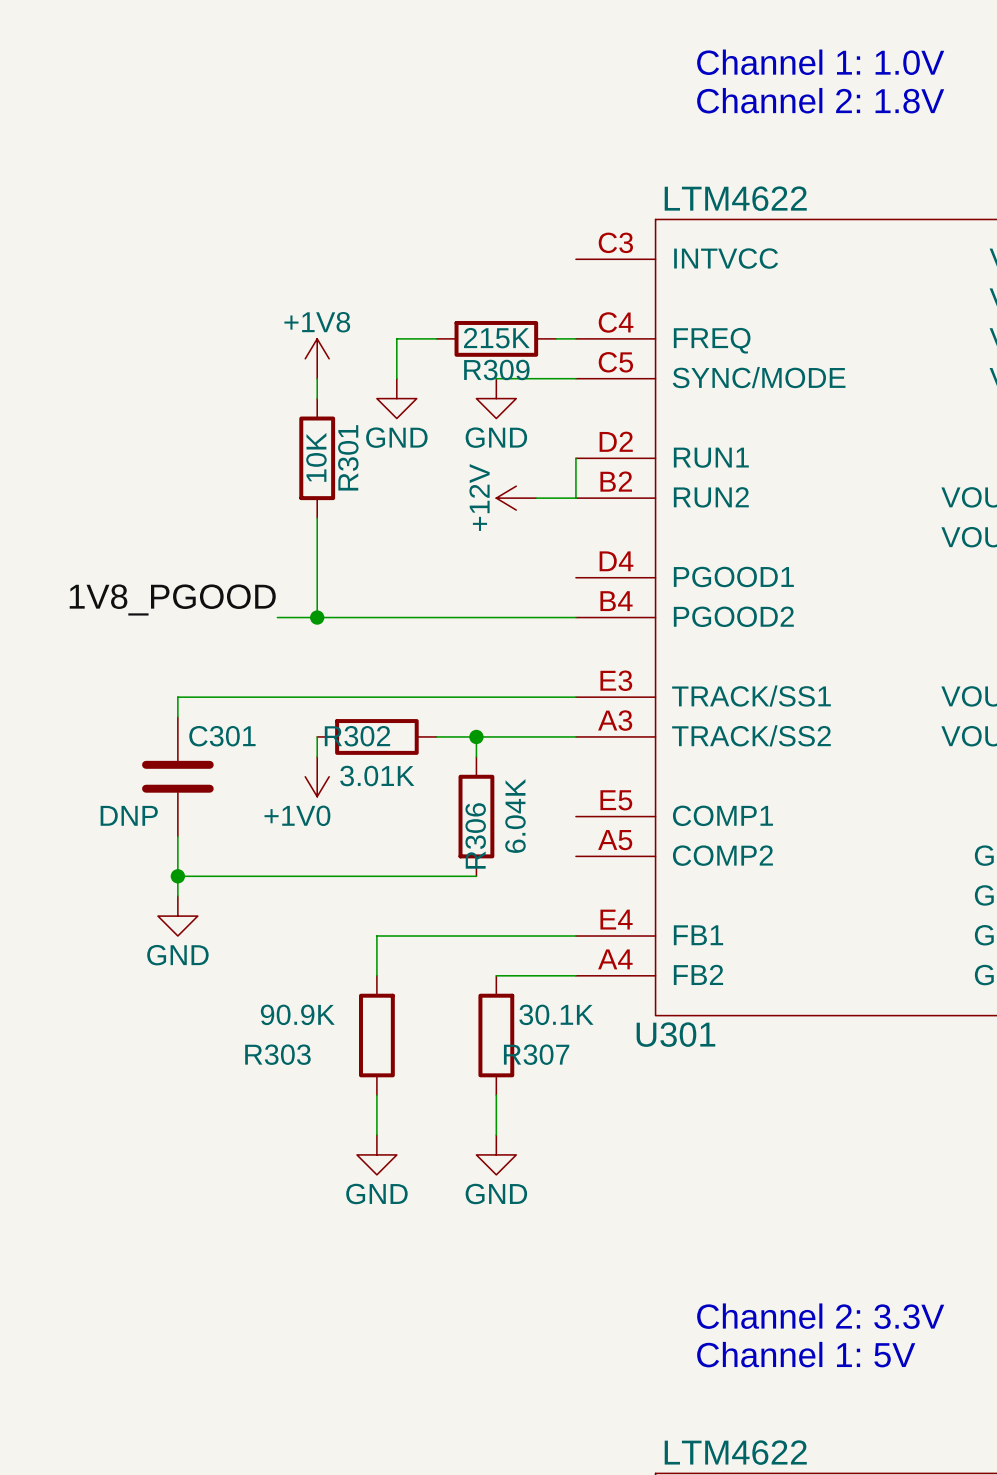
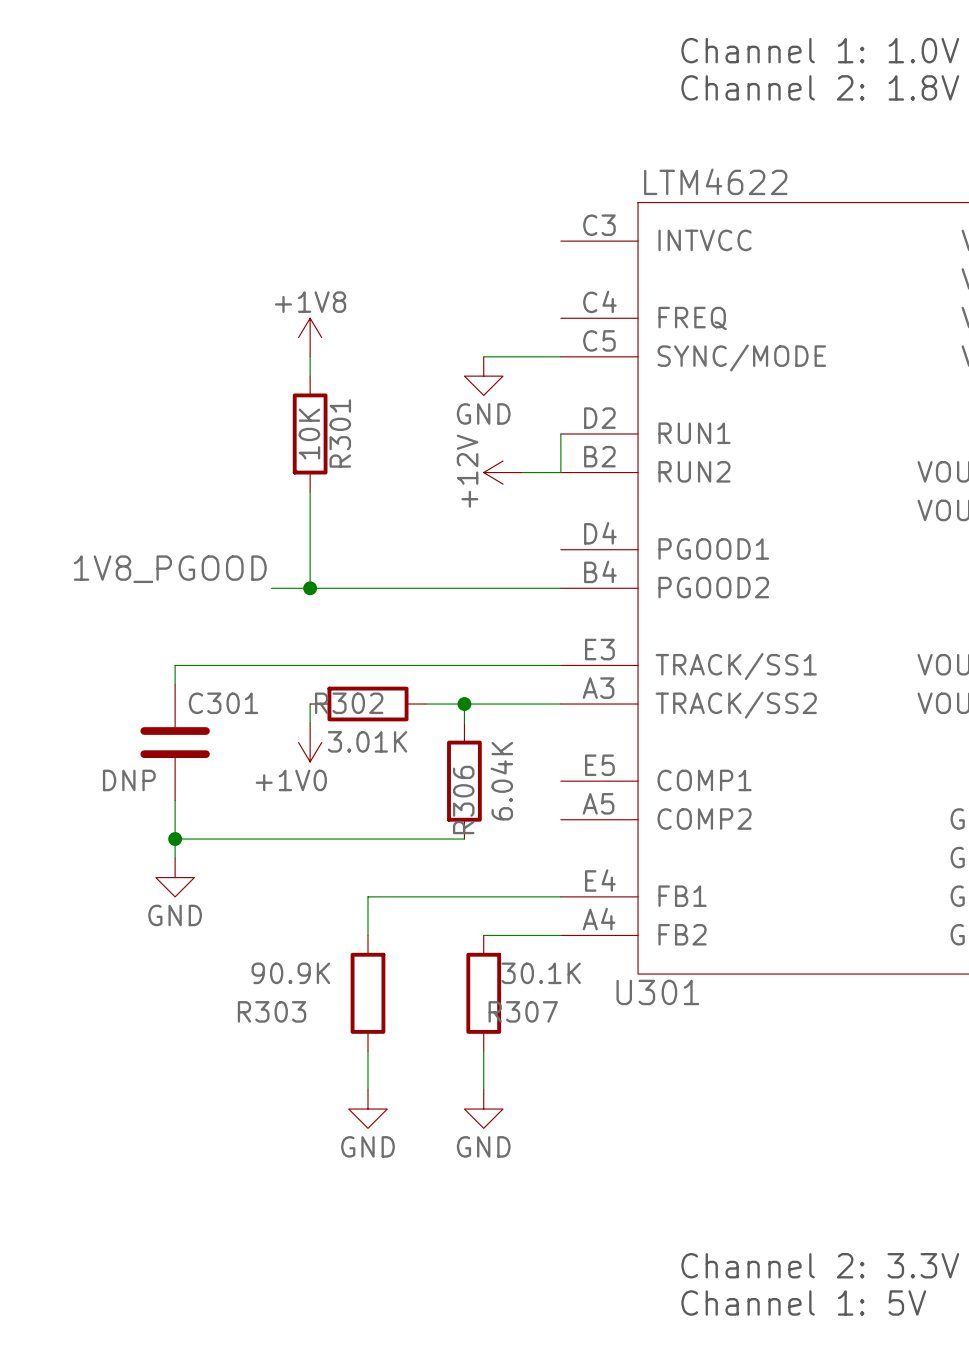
wire: (436, 338) (396, 338) (396, 378) -> none
R309: 215K (496, 338) -> none
wire: (556, 338) (575, 338) -> none
power symbol: GND (396, 398) -> none

